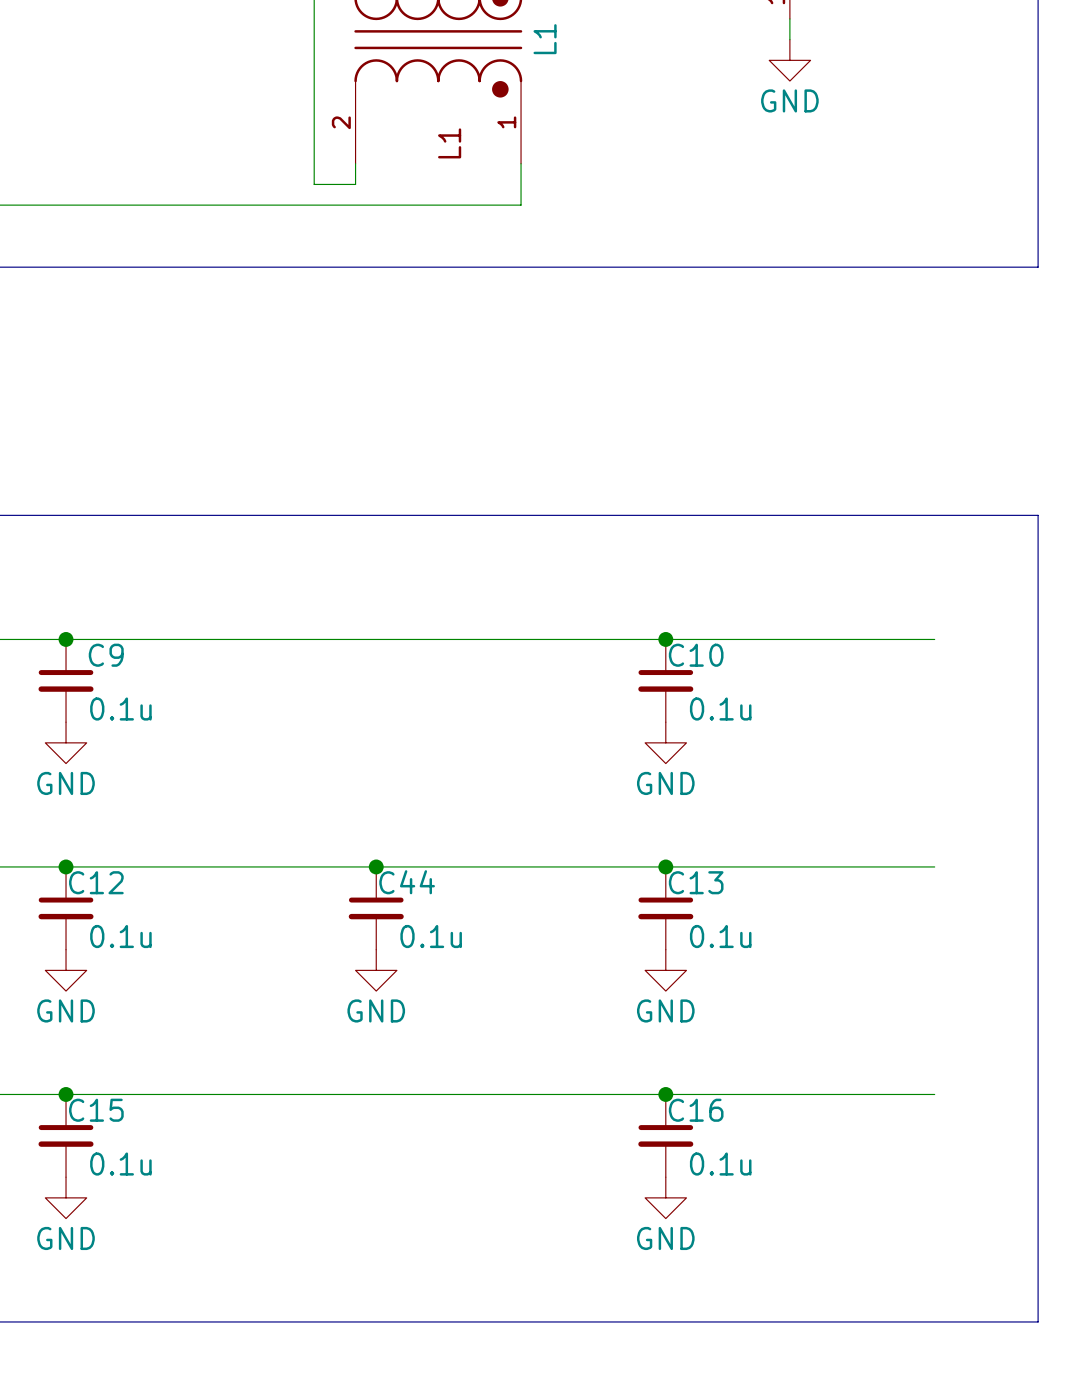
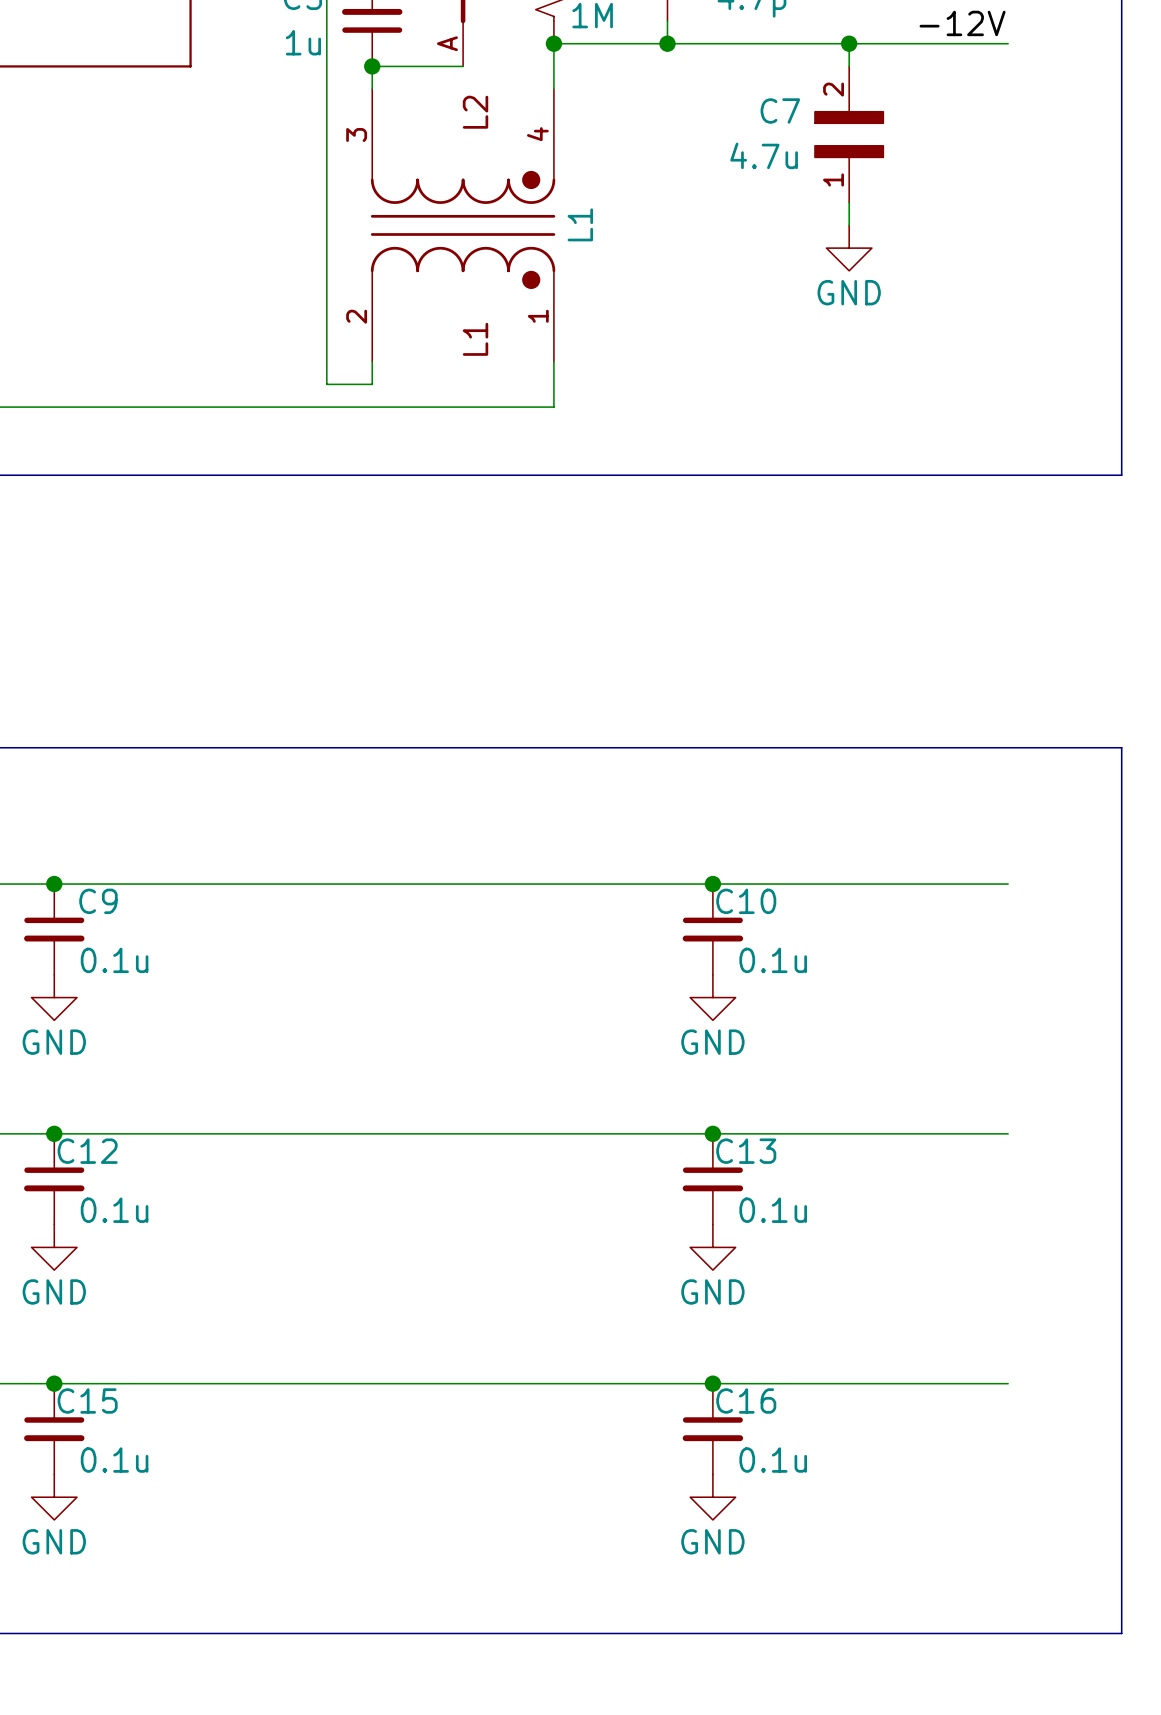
junction: (376, 866) -> none
C44: 0.1u (376, 908) -> none
power symbol: GND (376, 970) -> none

